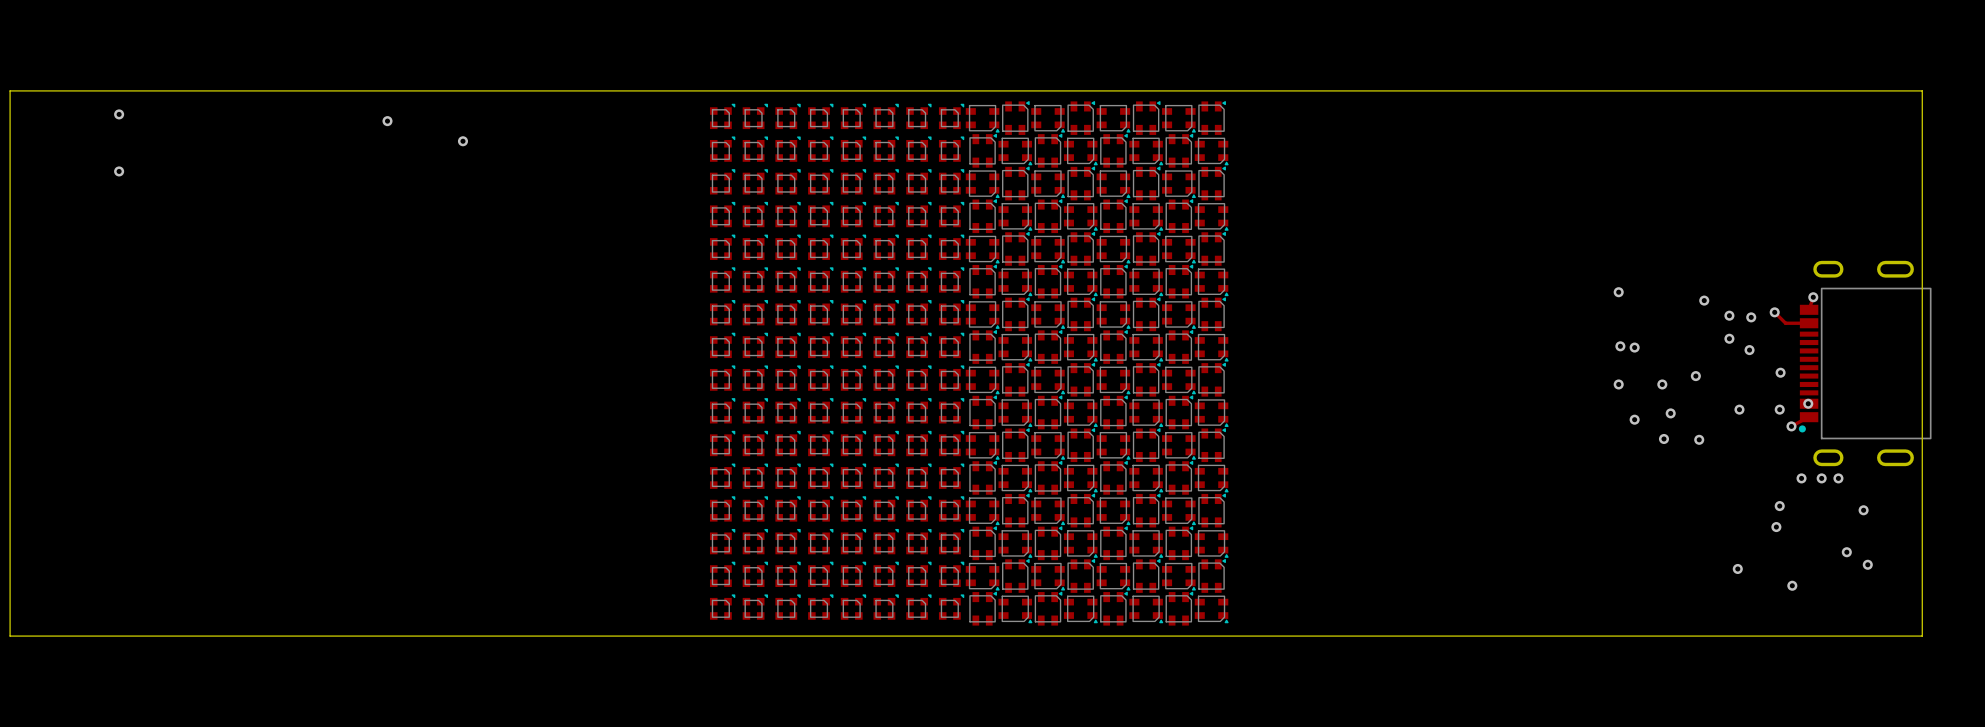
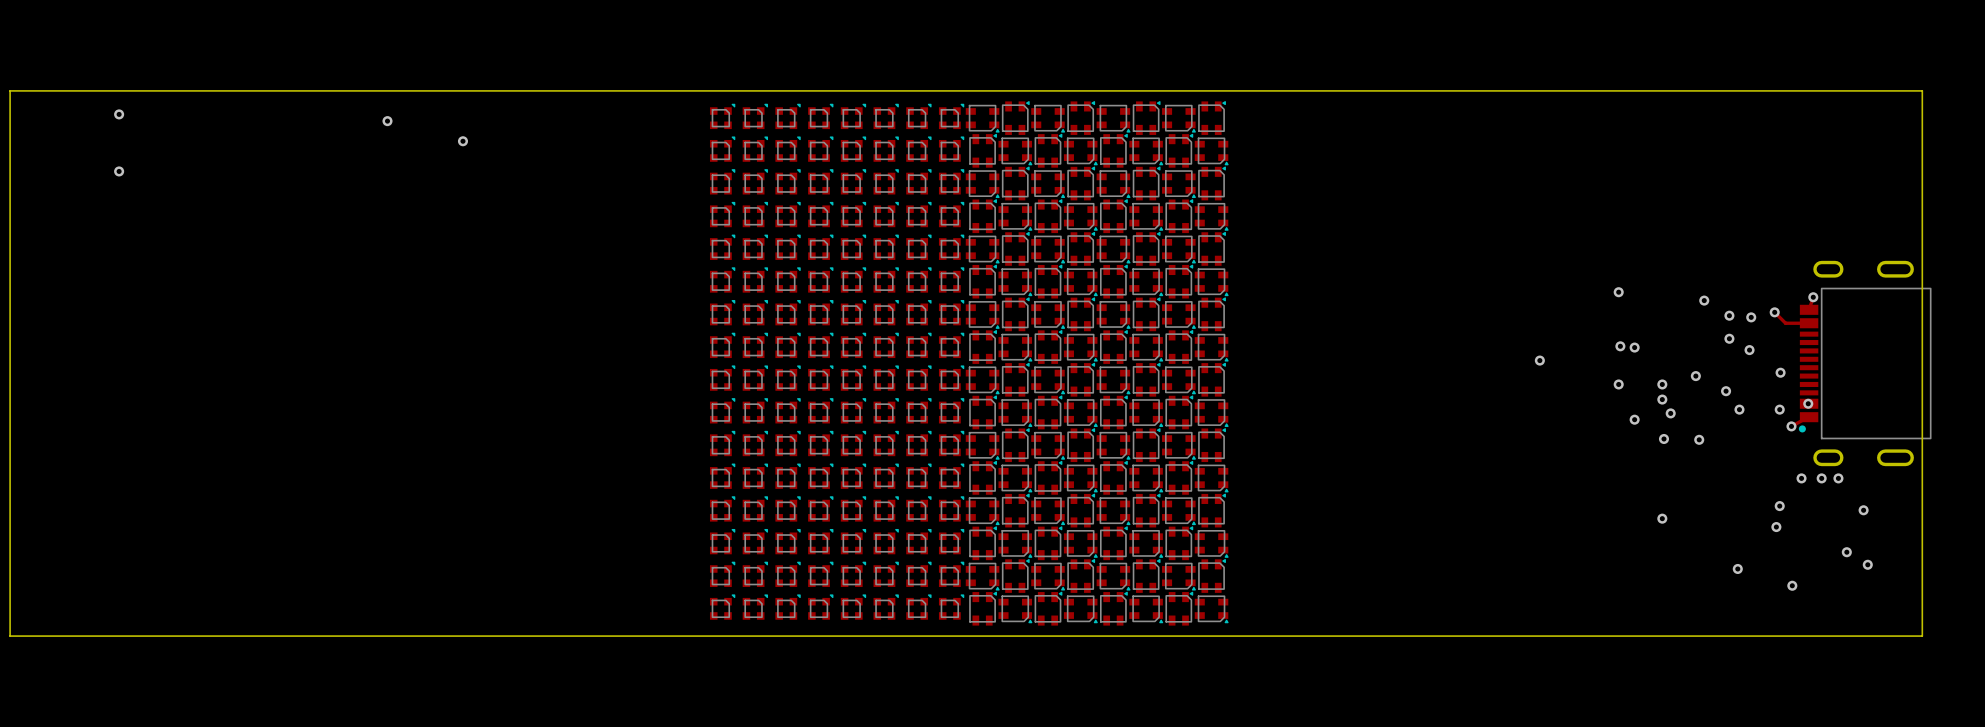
via: none -> (1539, 360)
via: none -> (1726, 391)
via: none -> (1662, 399)
via: none -> (1662, 518)

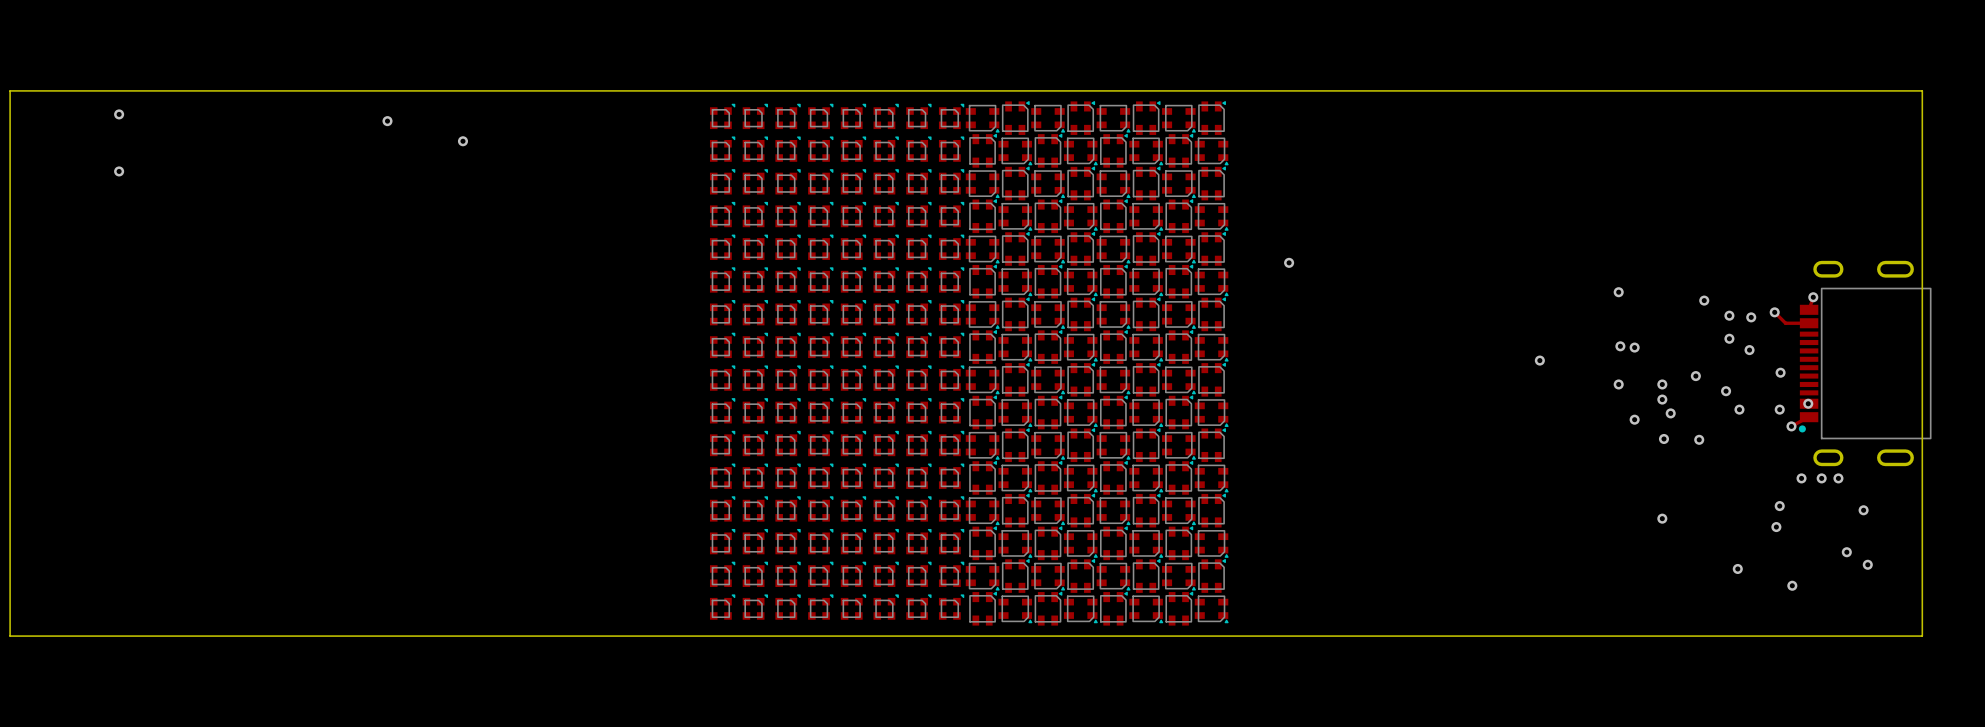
via: none -> (1289, 262)

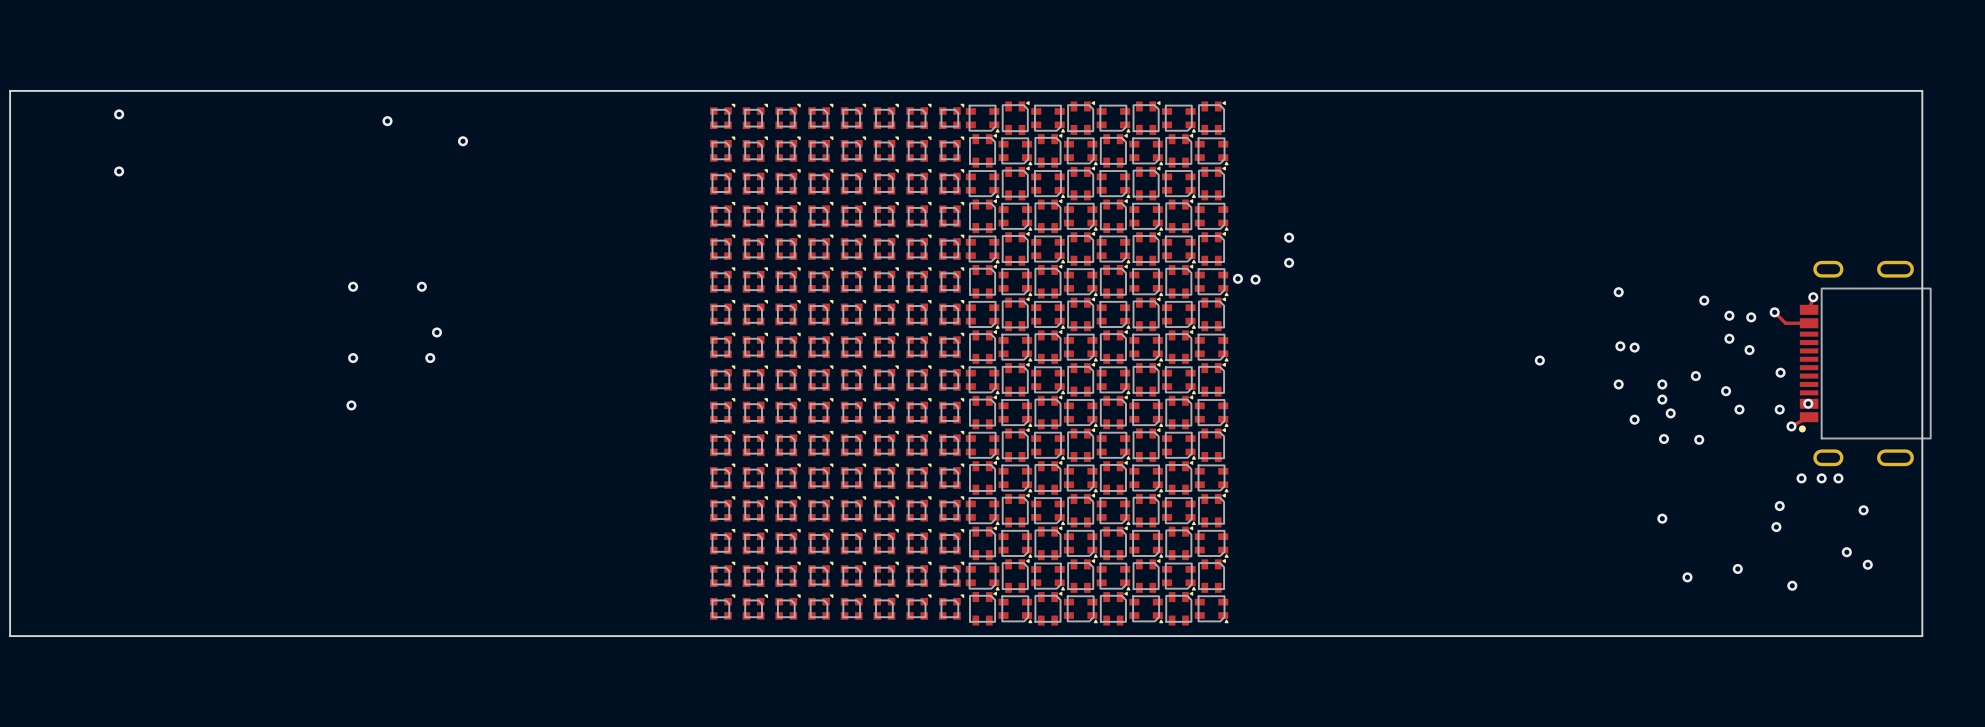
via: none -> (1289, 237)
via: none -> (1237, 278)
via: none -> (1255, 279)
via: none -> (353, 286)
via: none -> (421, 286)
via: none -> (436, 332)
via: none -> (353, 358)
via: none -> (430, 358)
via: none -> (351, 405)
via: none -> (1687, 577)

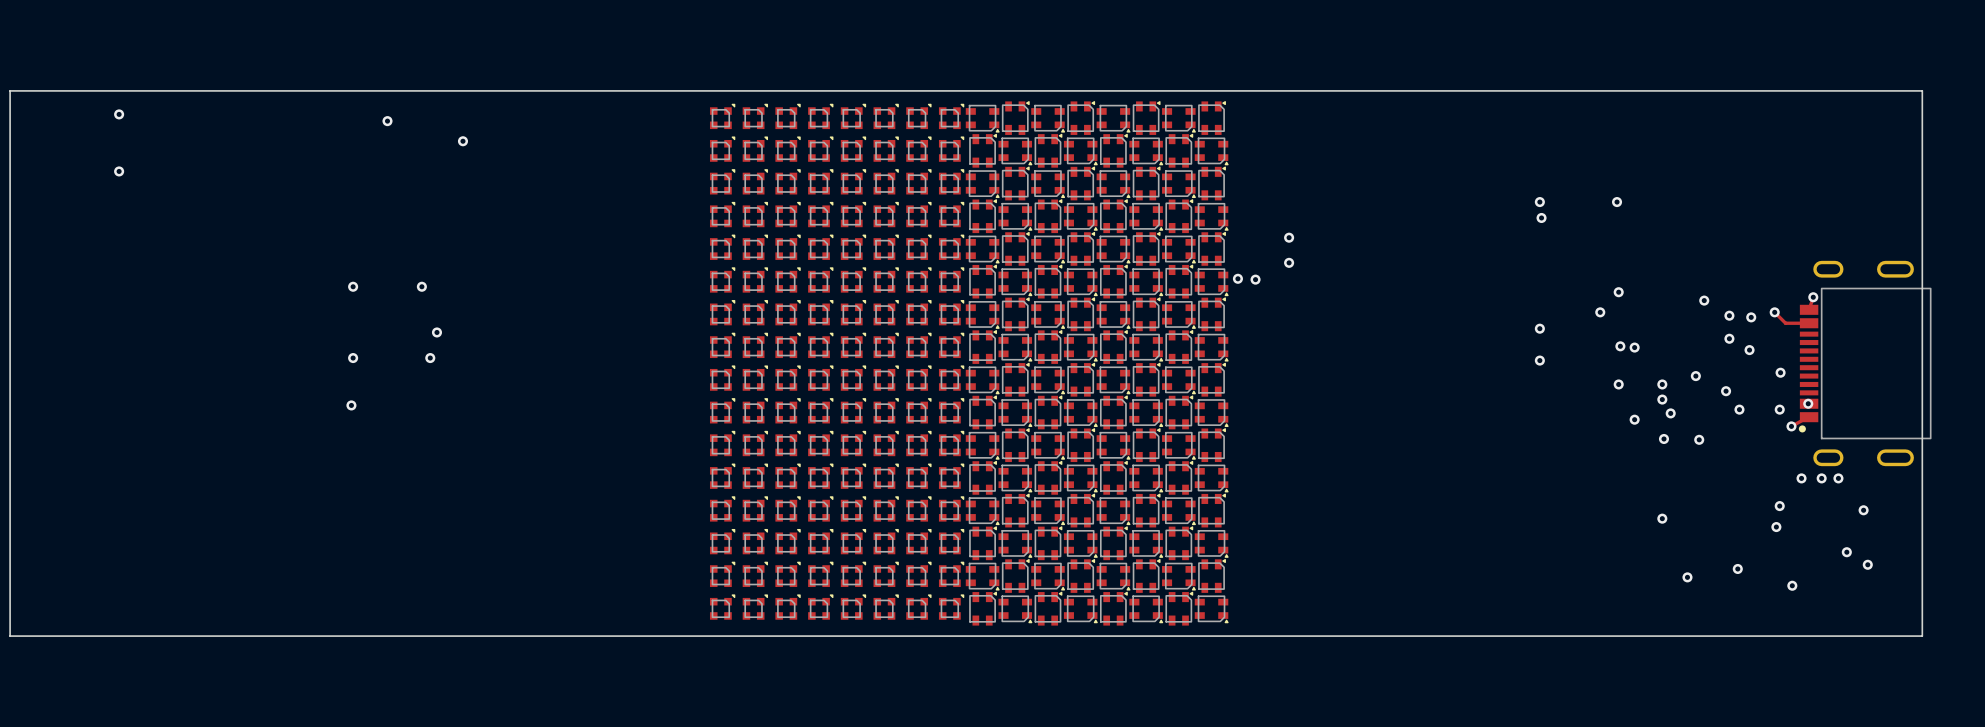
via: none -> (1539, 202)
via: none -> (1617, 202)
via: none -> (1541, 217)
via: none -> (1600, 312)
via: none -> (1539, 328)

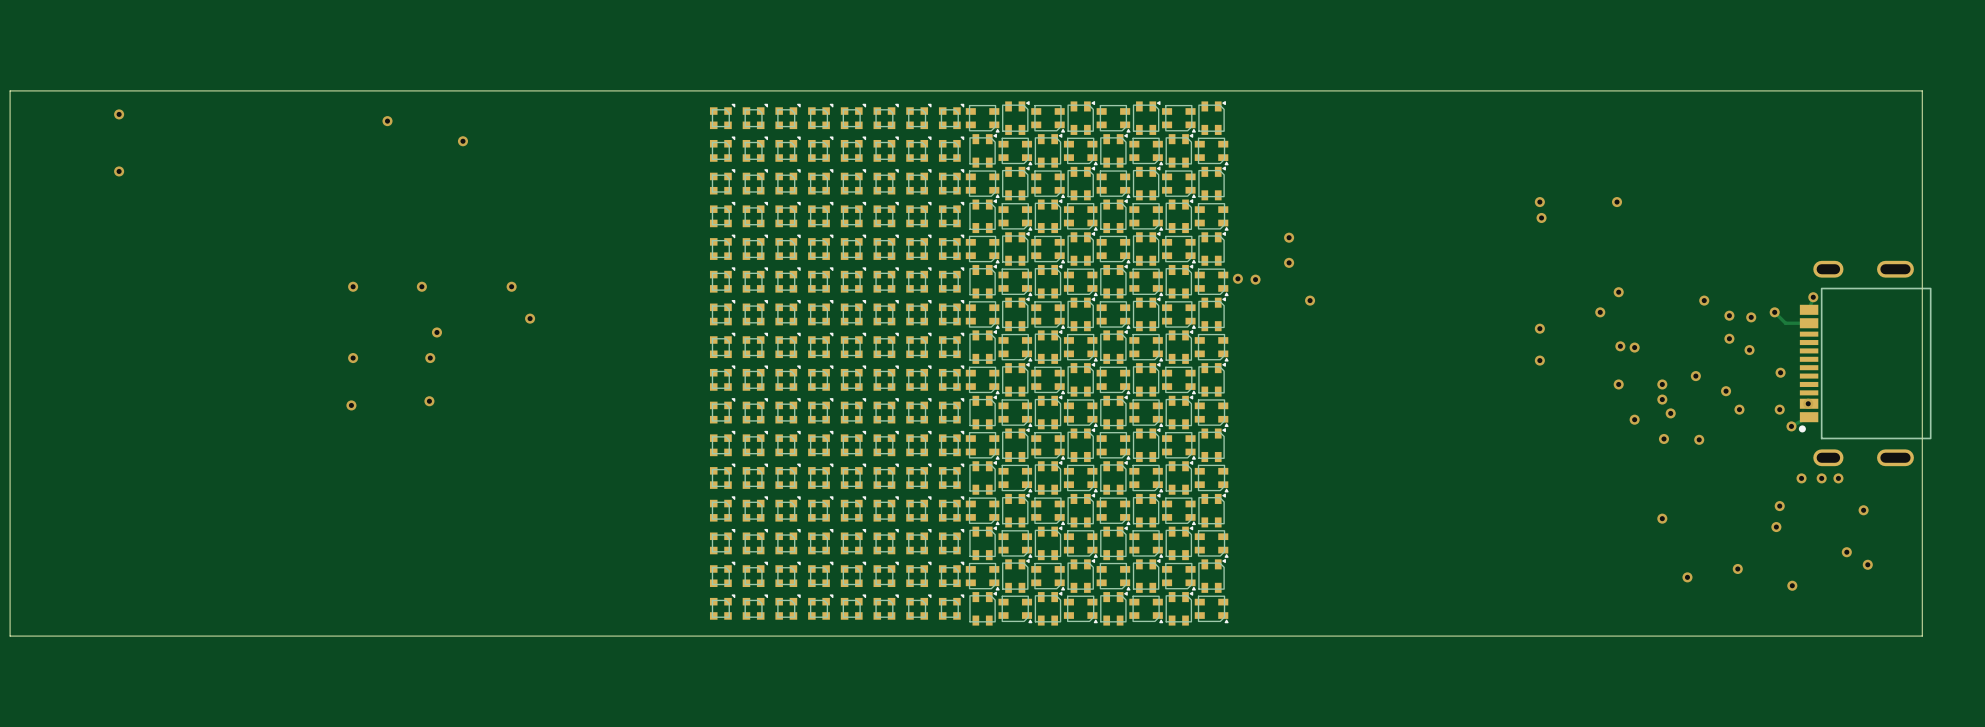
via: none -> (511, 286)
via: none -> (1310, 300)
via: none -> (530, 318)
via: none -> (429, 401)

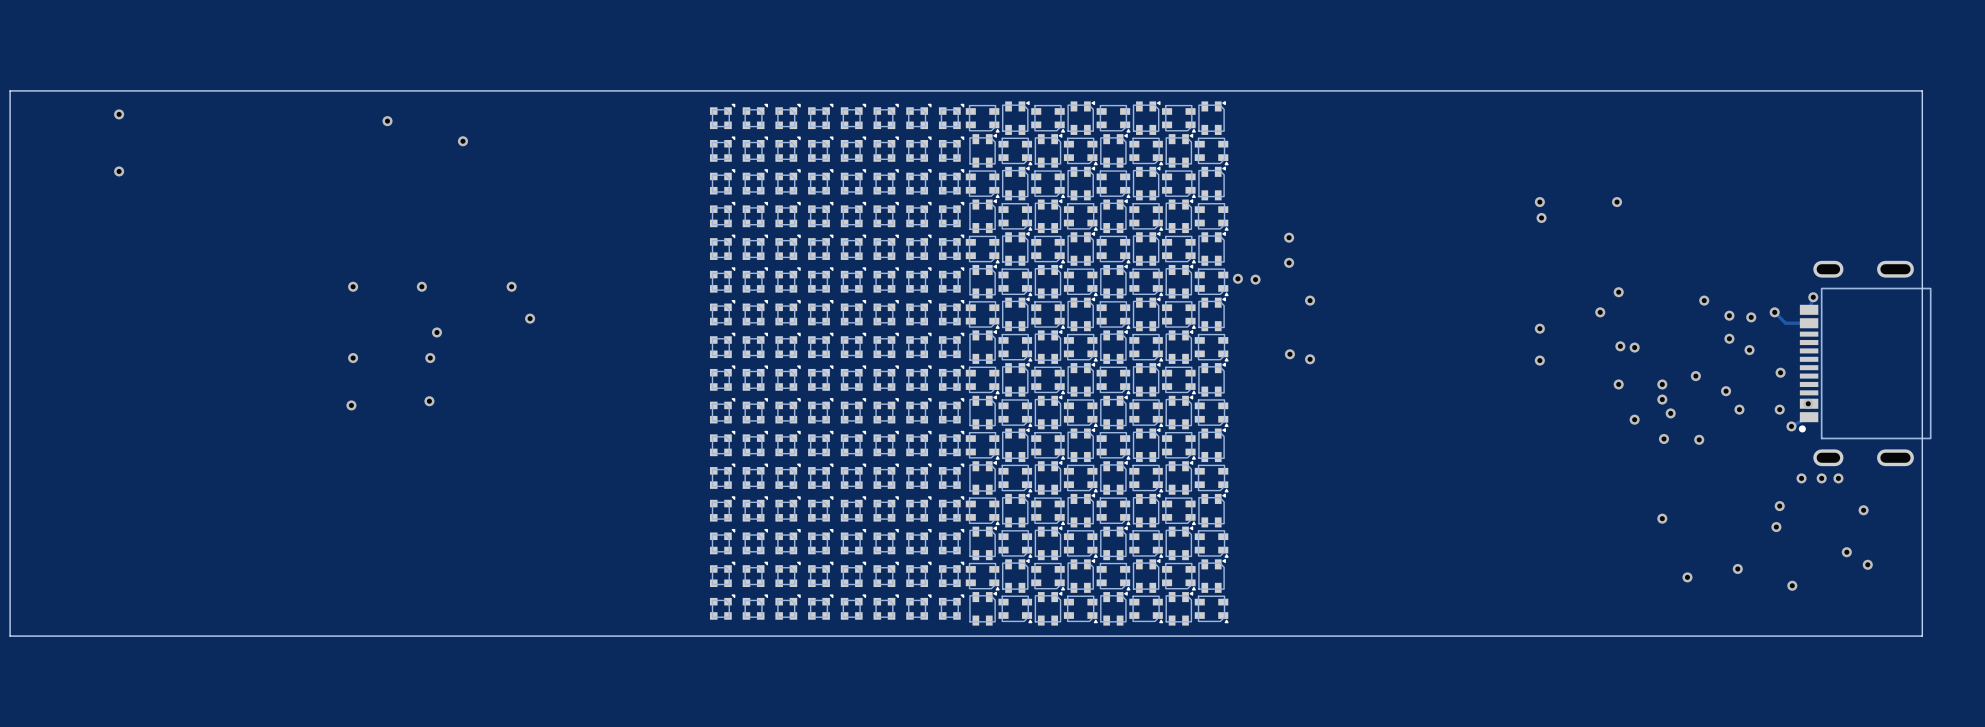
via: none -> (1289, 354)
via: none -> (1310, 359)

